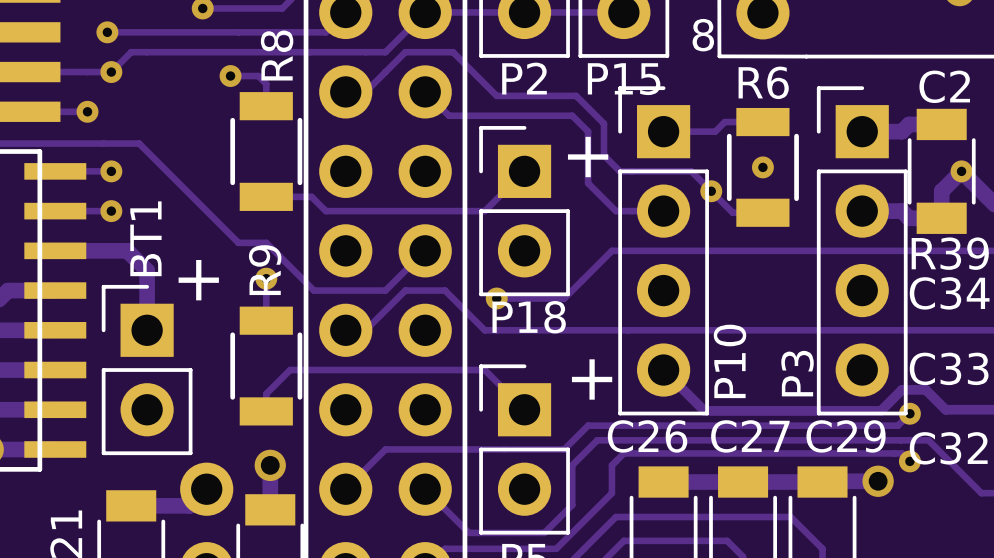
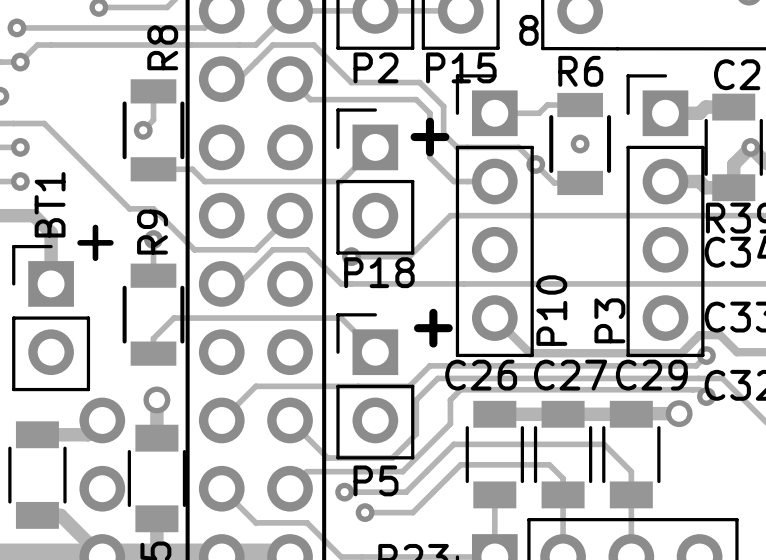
track: (230, 76) (258, 76) (266, 83) (266, 106) -> (143, 130) (153, 120) (153, 91)
via: (230, 76) -> none
via: none -> (143, 130)

